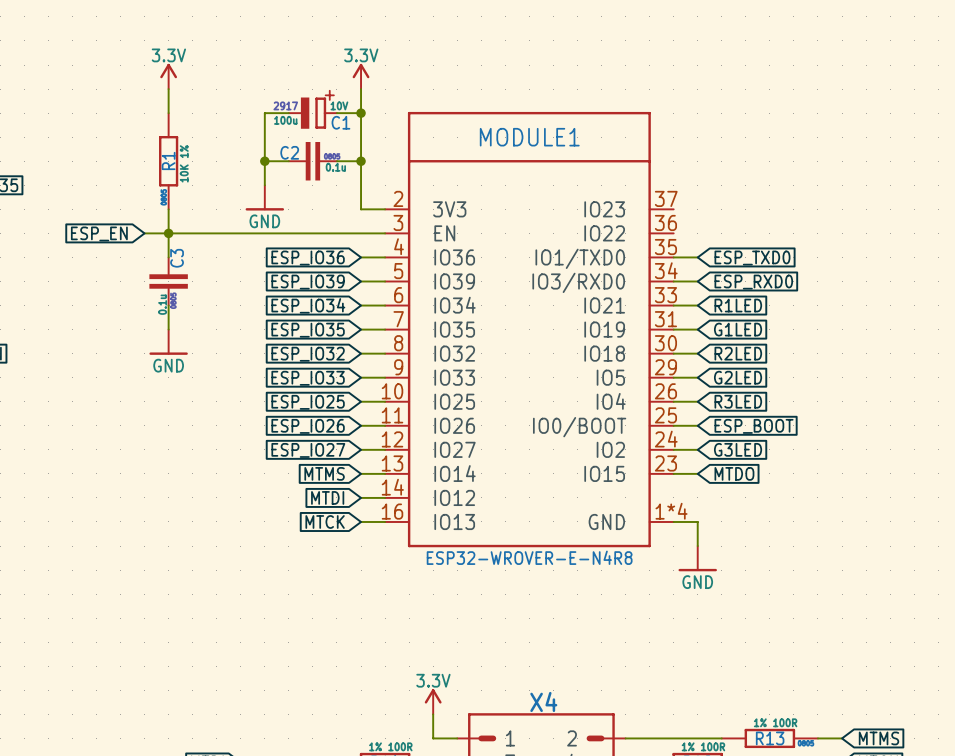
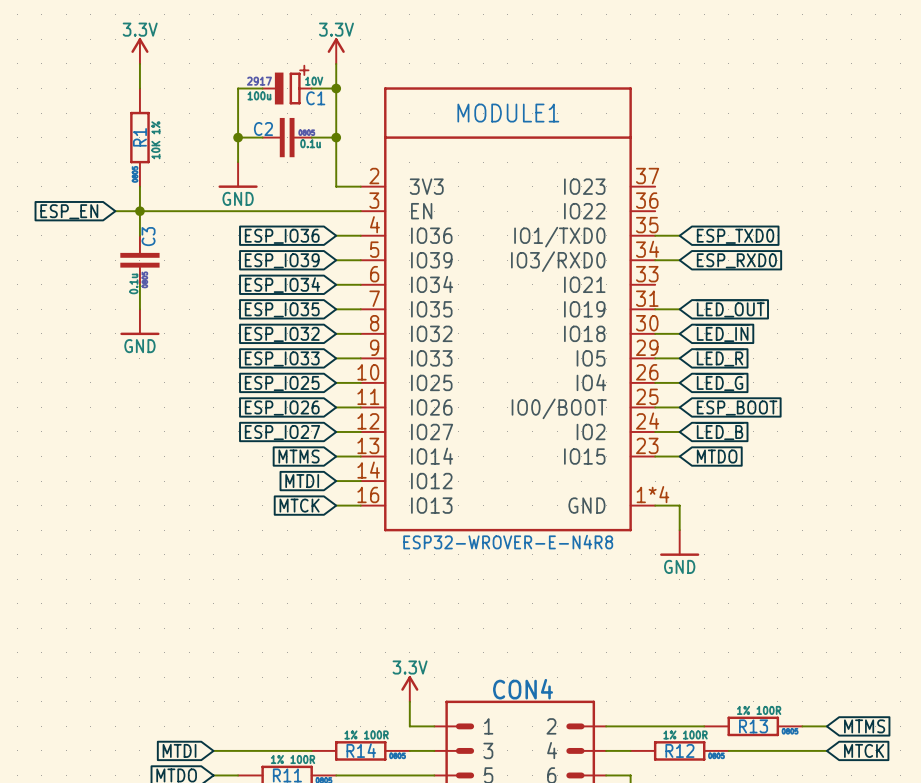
wire: (673, 305) (697, 305) -> none
global label: R1LED (738, 305) -> none
global label: G1LED (738, 329) -> ~{LED_OUT} (730, 308)
global label: R2LED (738, 353) -> ~{LED_IN} (722, 333)
global label: G2LED (738, 377) -> ~{LED_R} (719, 357)
global label: R3LED (738, 401) -> ~{LED_G} (719, 382)
global label: G3LED (738, 449) -> ~{LED_B} (719, 431)
X4 name: X4 (543, 701) -> CON4 (523, 689)

